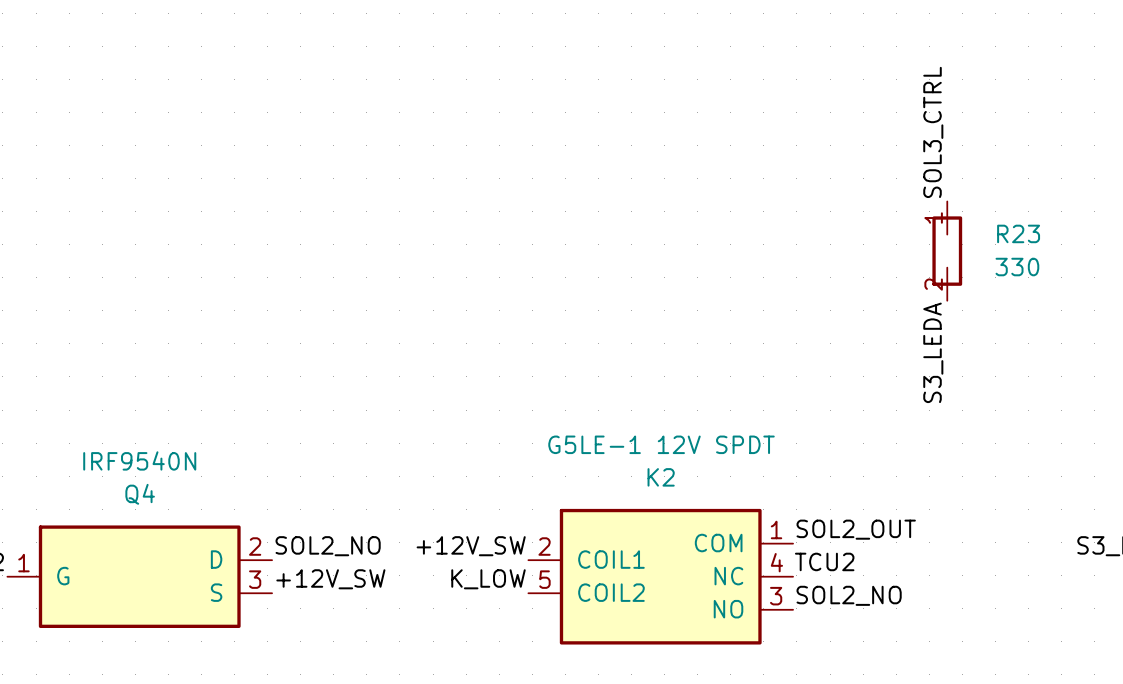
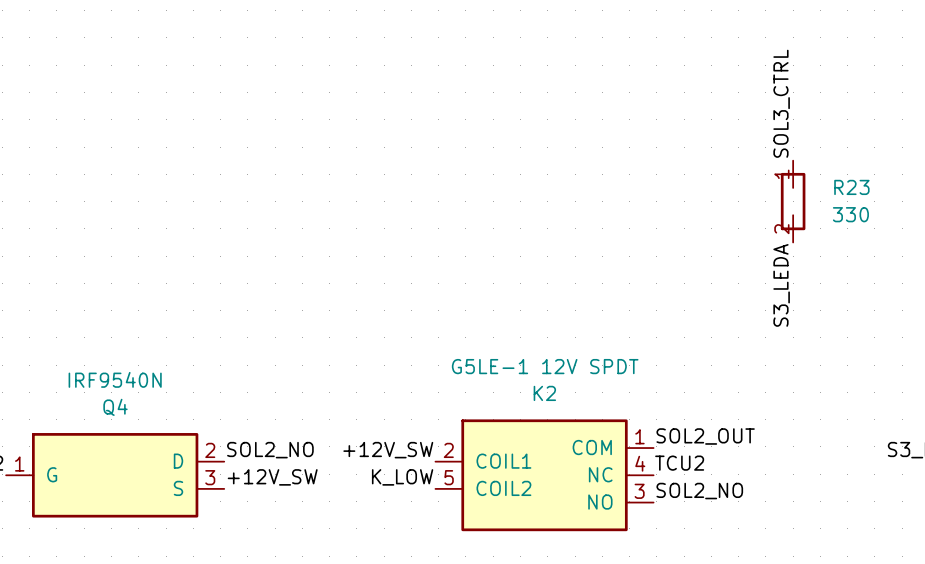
label position: SOL3_CTRL (933, 132) -> SOL3_CTRL (781, 103)
R23 position: (947, 251) -> (793, 201)
label position: S3_LEDA (933, 352) -> S3_LEDA (781, 285)

